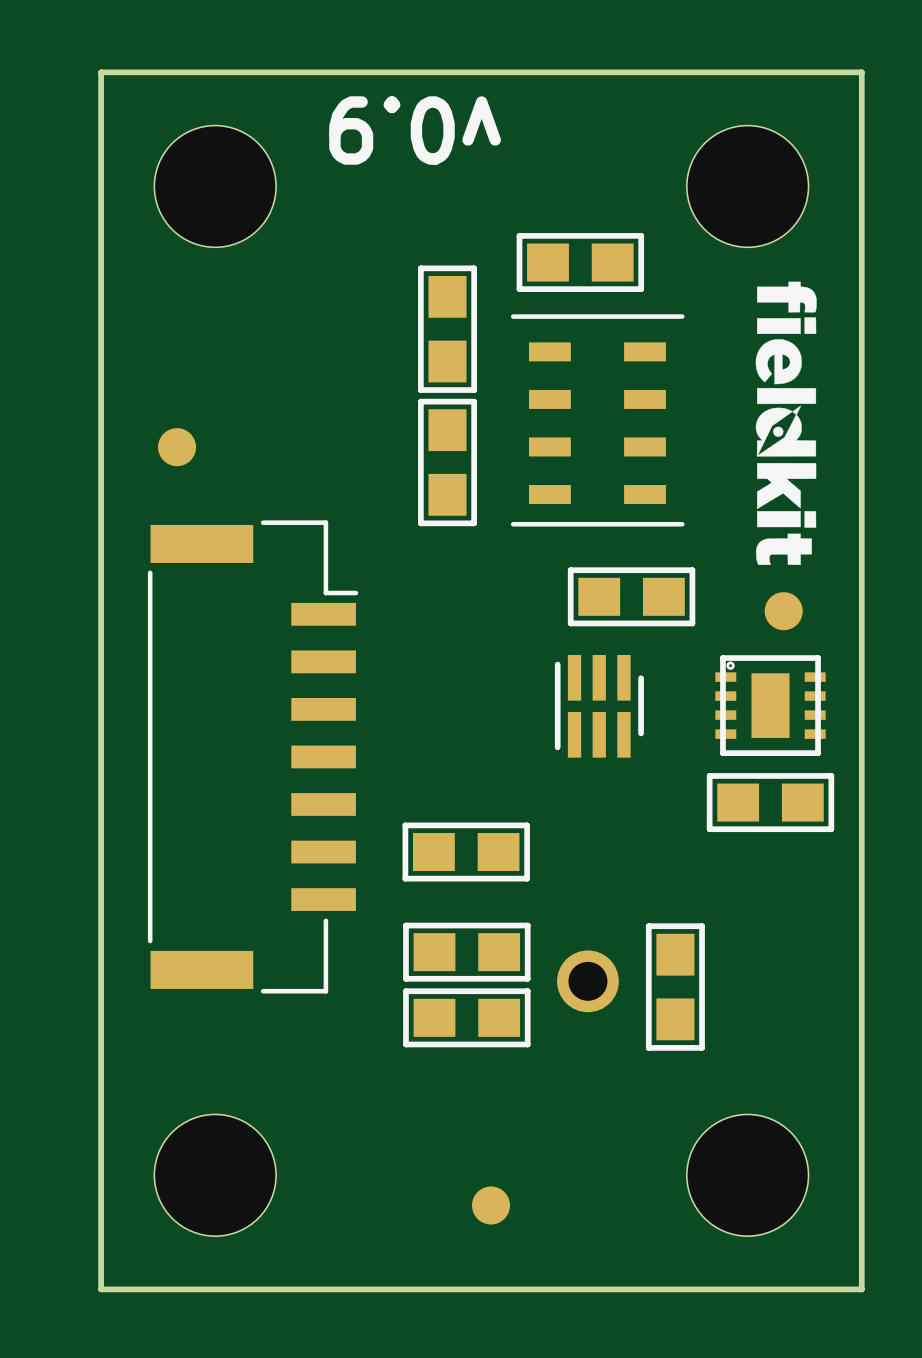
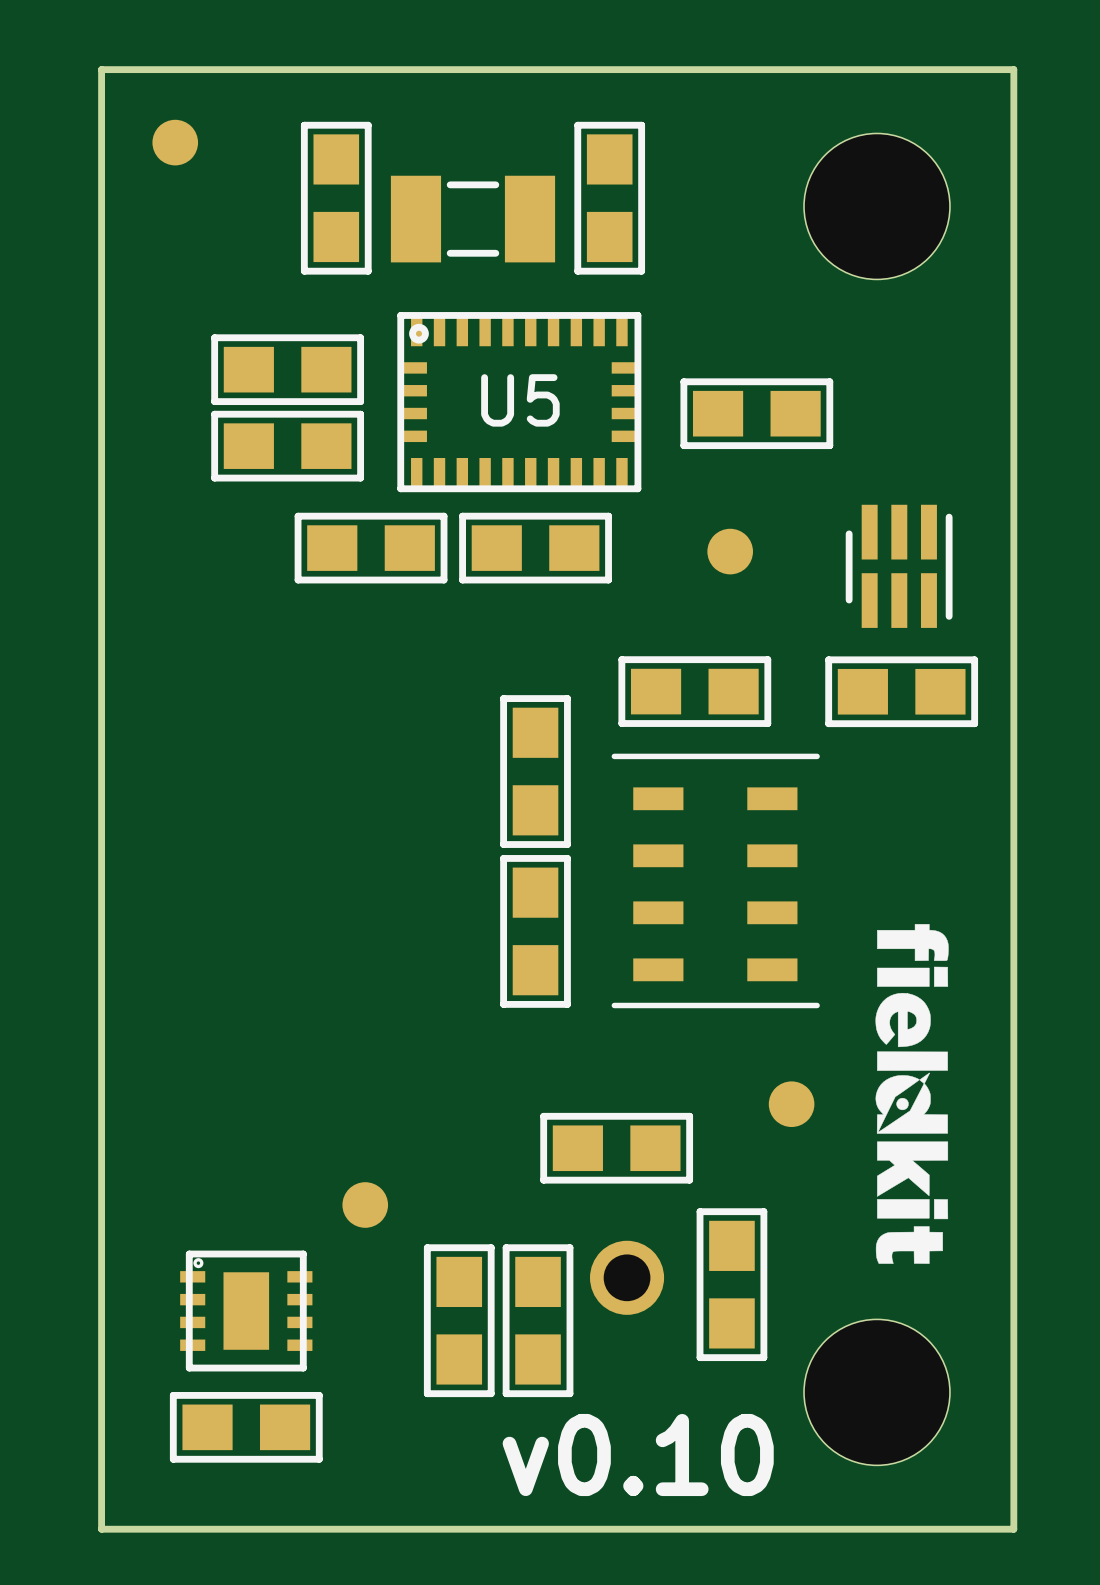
text: v0.9 (415, 130) -> none
part: none -> (175, 142)
part: none -> (336, 198)
part: none -> (609, 198)
part: (215, 186) -> none
part: none -> (472, 219)
part: (580, 262) -> none
part: none -> (287, 369)
part: (447, 329) -> none
U5: none -> (519, 402)
part: none -> (756, 413)
part: none -> (287, 446)
part position: (597, 420) -> (715, 880)
drawing position: (786, 423) -> (912, 1093)
part: (177, 447) -> none
part rotation: 0° (447, 462) -> 90° clockwise (535, 548)
part: none -> (371, 548)
part: none -> (730, 551)
part footprint: [764, 592, 803, 631] -> [825, 656, 979, 728]
part position: (631, 596) -> (694, 691)
part: none -> (535, 771)
part position: (770, 705) -> (246, 1311)
part rotation: 0° (599, 706) -> 180° (899, 566)
part position: (599, 706) -> (899, 566)
part: (253, 756) -> none
part: (770, 802) -> none
part rotation: 0° (466, 852) -> 90° clockwise (535, 931)
part: none -> (791, 1104)
part: (466, 952) -> none
part: none -> (616, 1148)
part position: (587, 981) -> (627, 1277)
part: (675, 987) -> none
part: (466, 1017) -> none
part: none -> (365, 1205)
part: none -> (731, 1284)
part footprint: [154, 1114, 277, 1237] -> [169, 1391, 323, 1463]
part: none -> (459, 1320)
part: none -> (538, 1320)
part: (491, 1205) -> none
text: none -> v0.10 (638, 1455)

